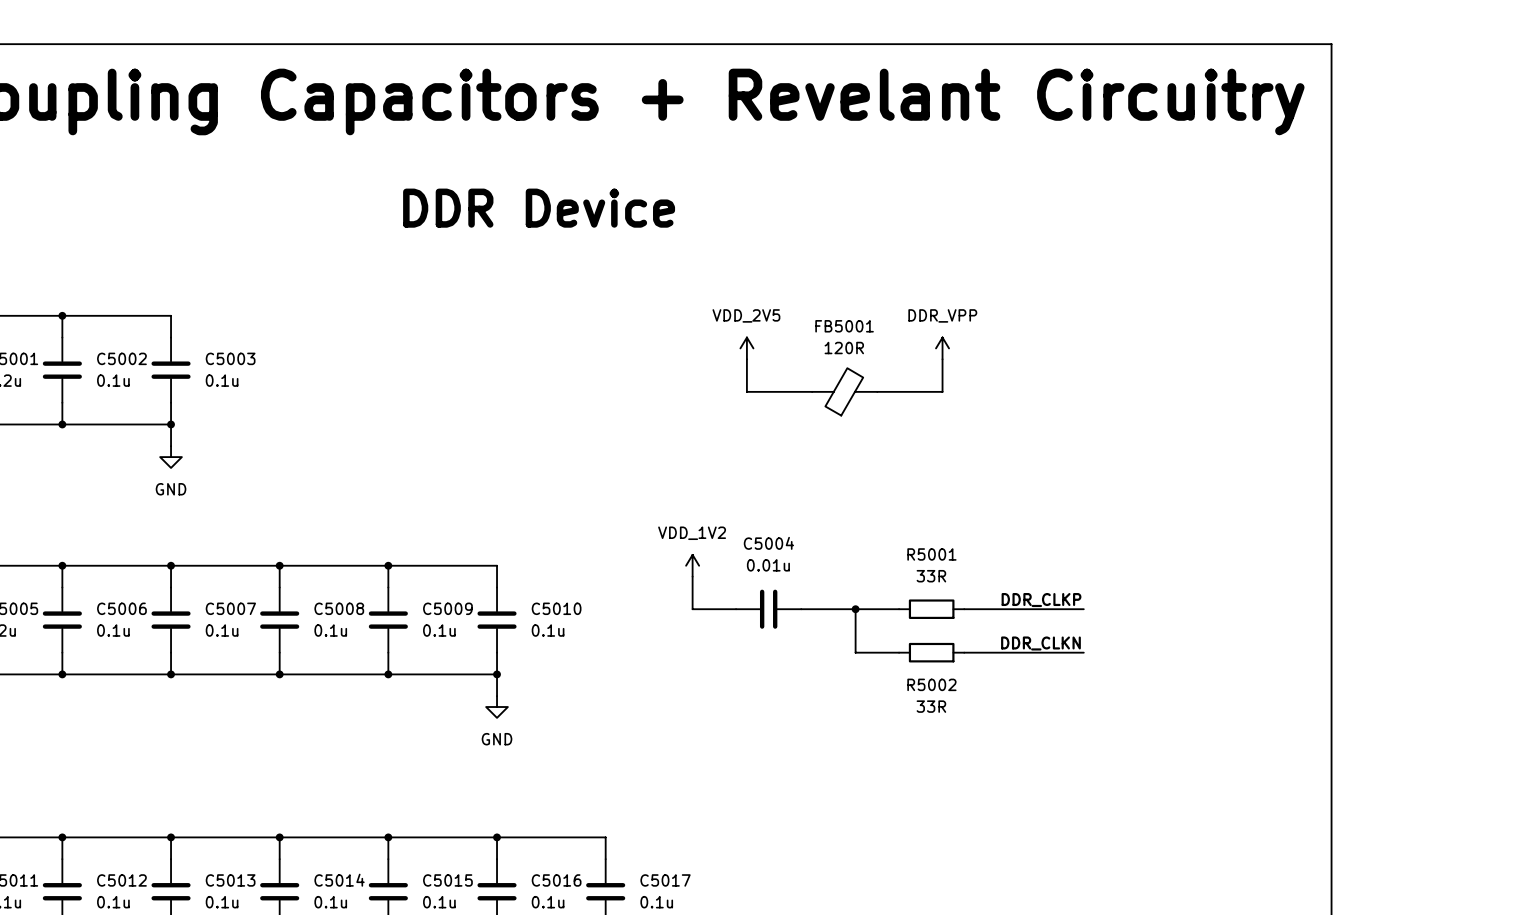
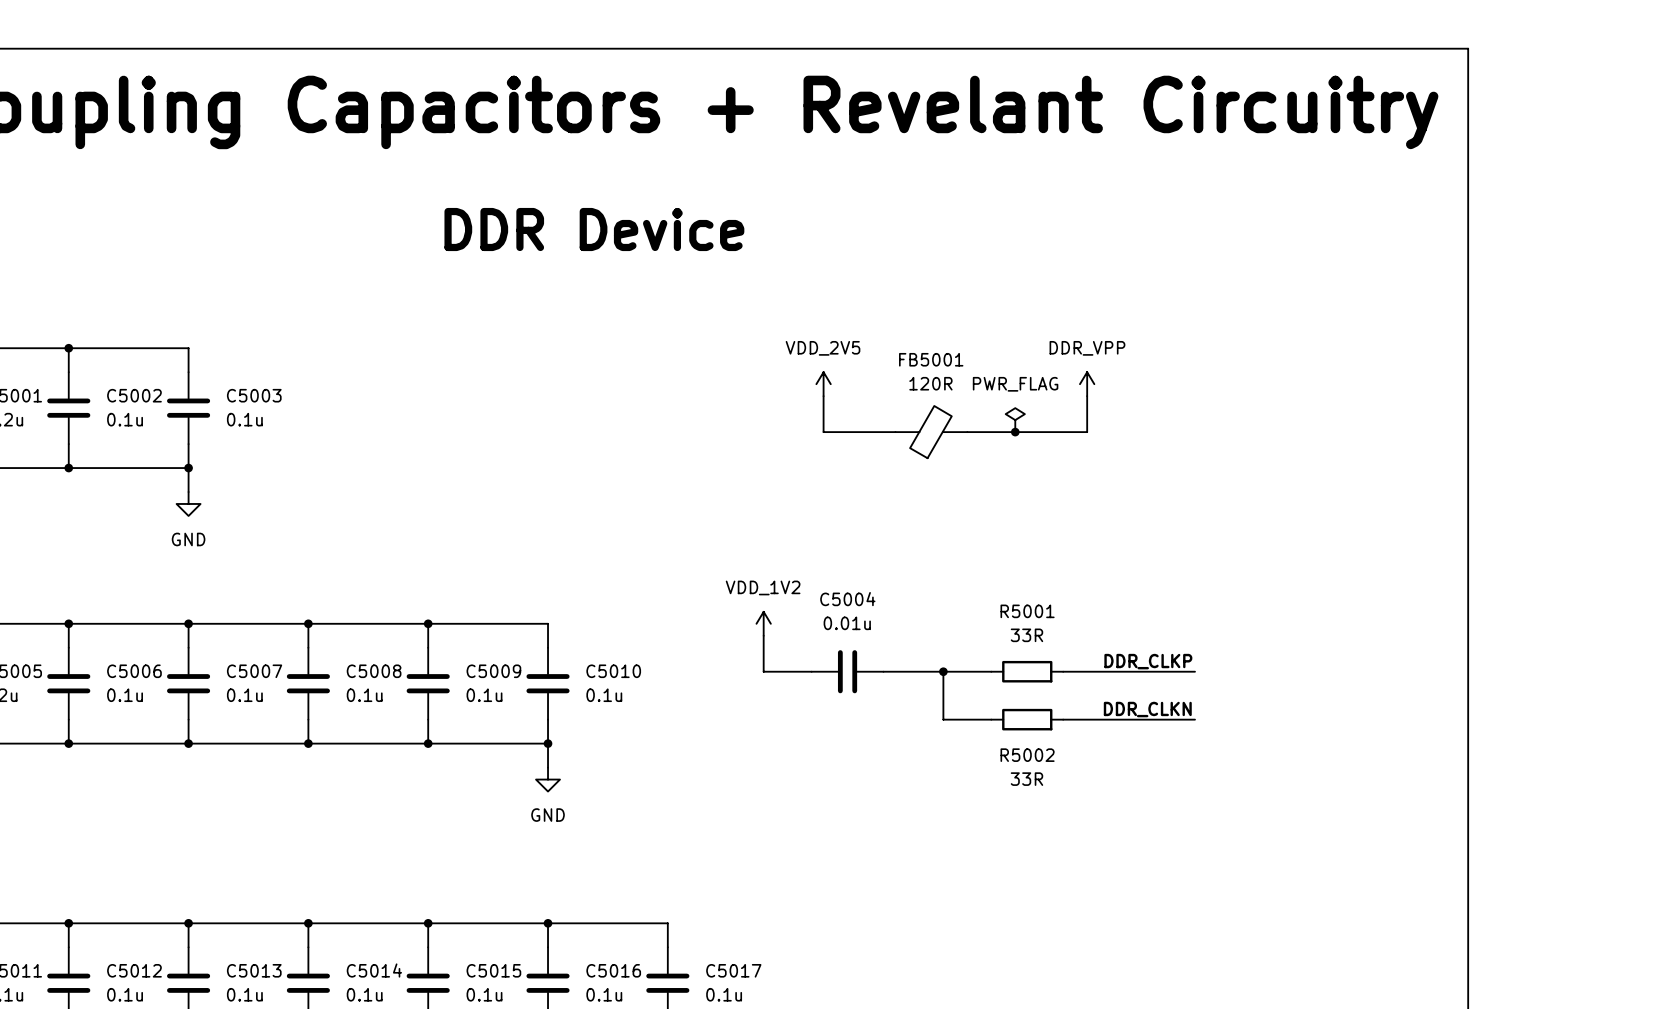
power symbol position: DDR_VPP (942, 348) -> DDR_VPP (1087, 384)
wire: (942, 359) (942, 391) -> (1087, 396) (1087, 432) (1039, 432)
power symbol: none -> PWR_FLAG (1015, 420)
junction: none -> (1015, 432)

